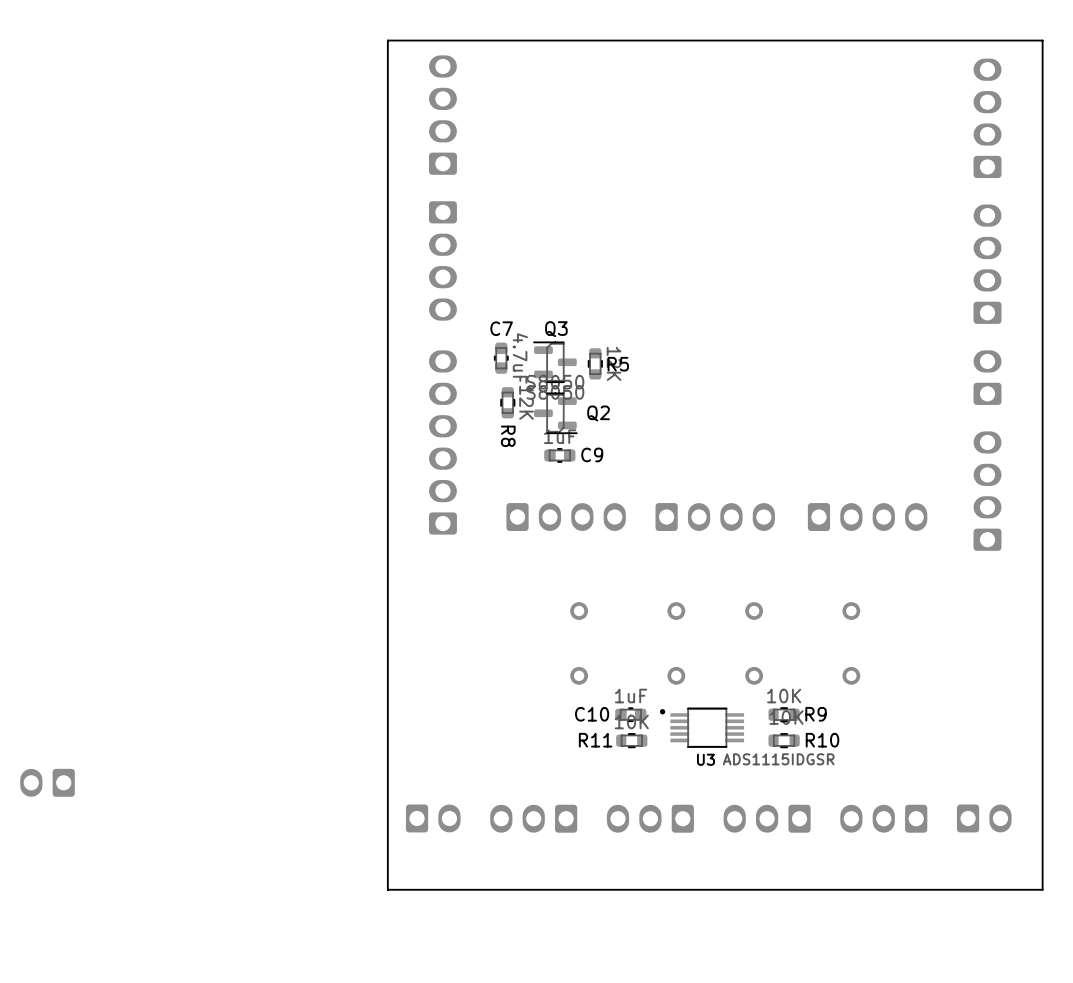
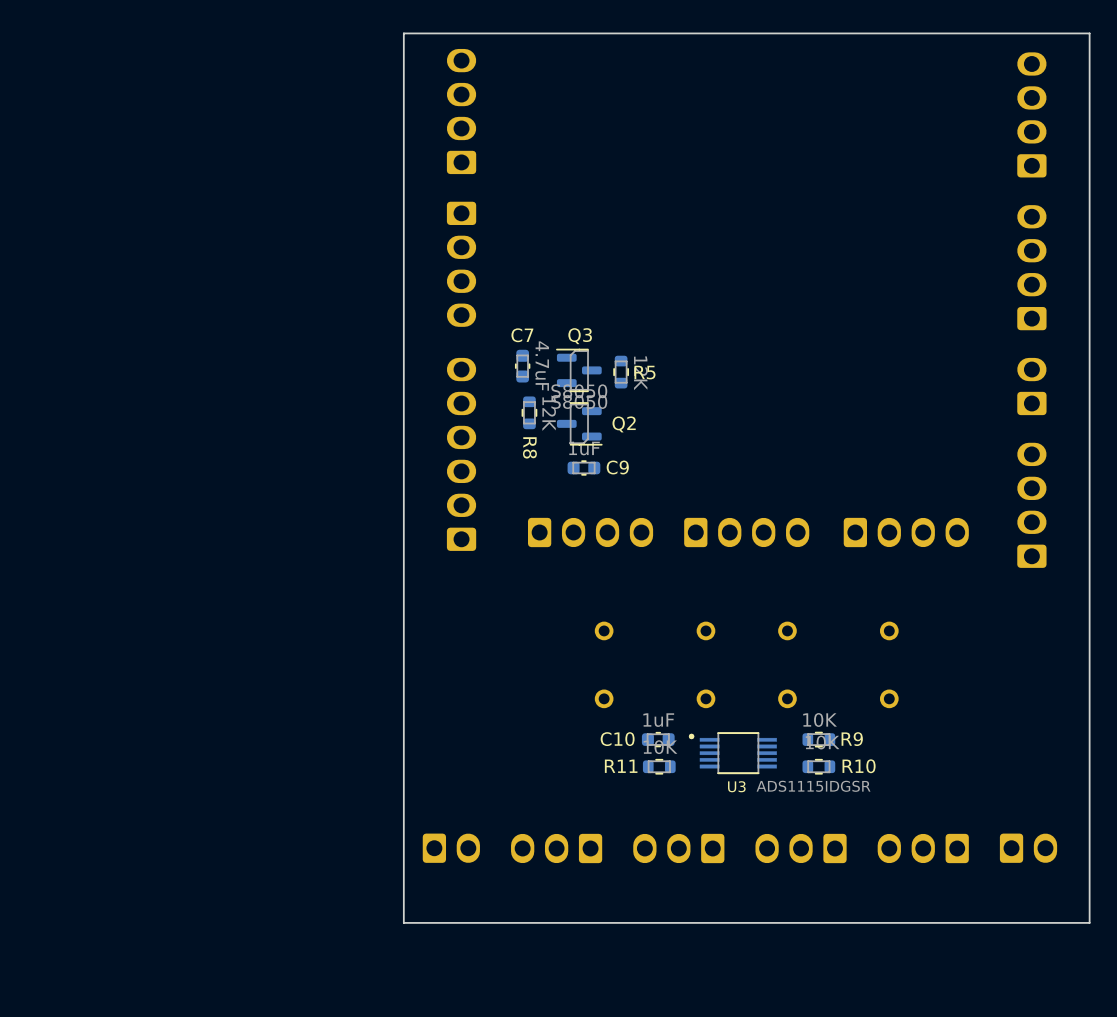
part: (47, 782) -> none

